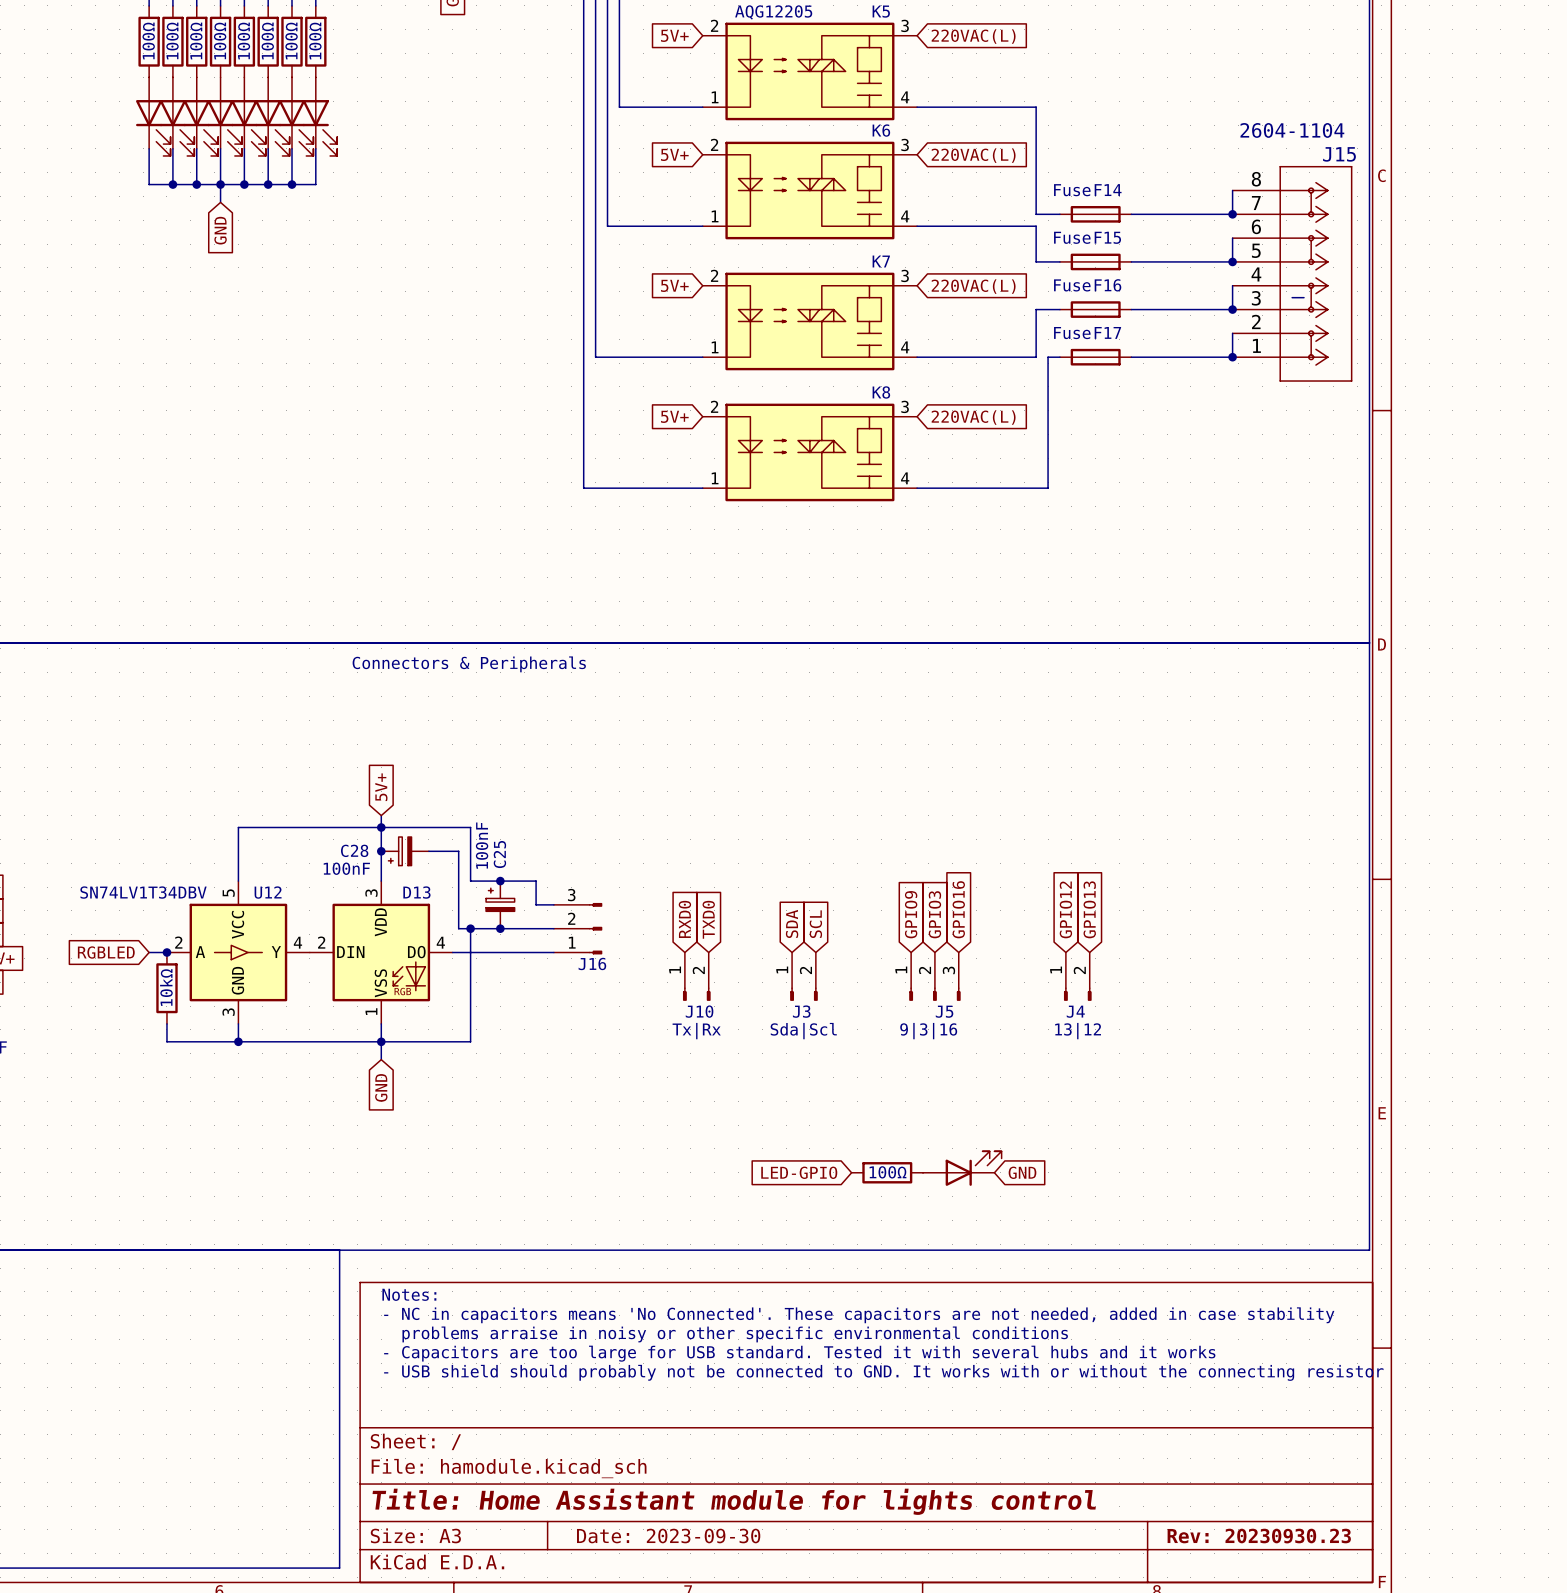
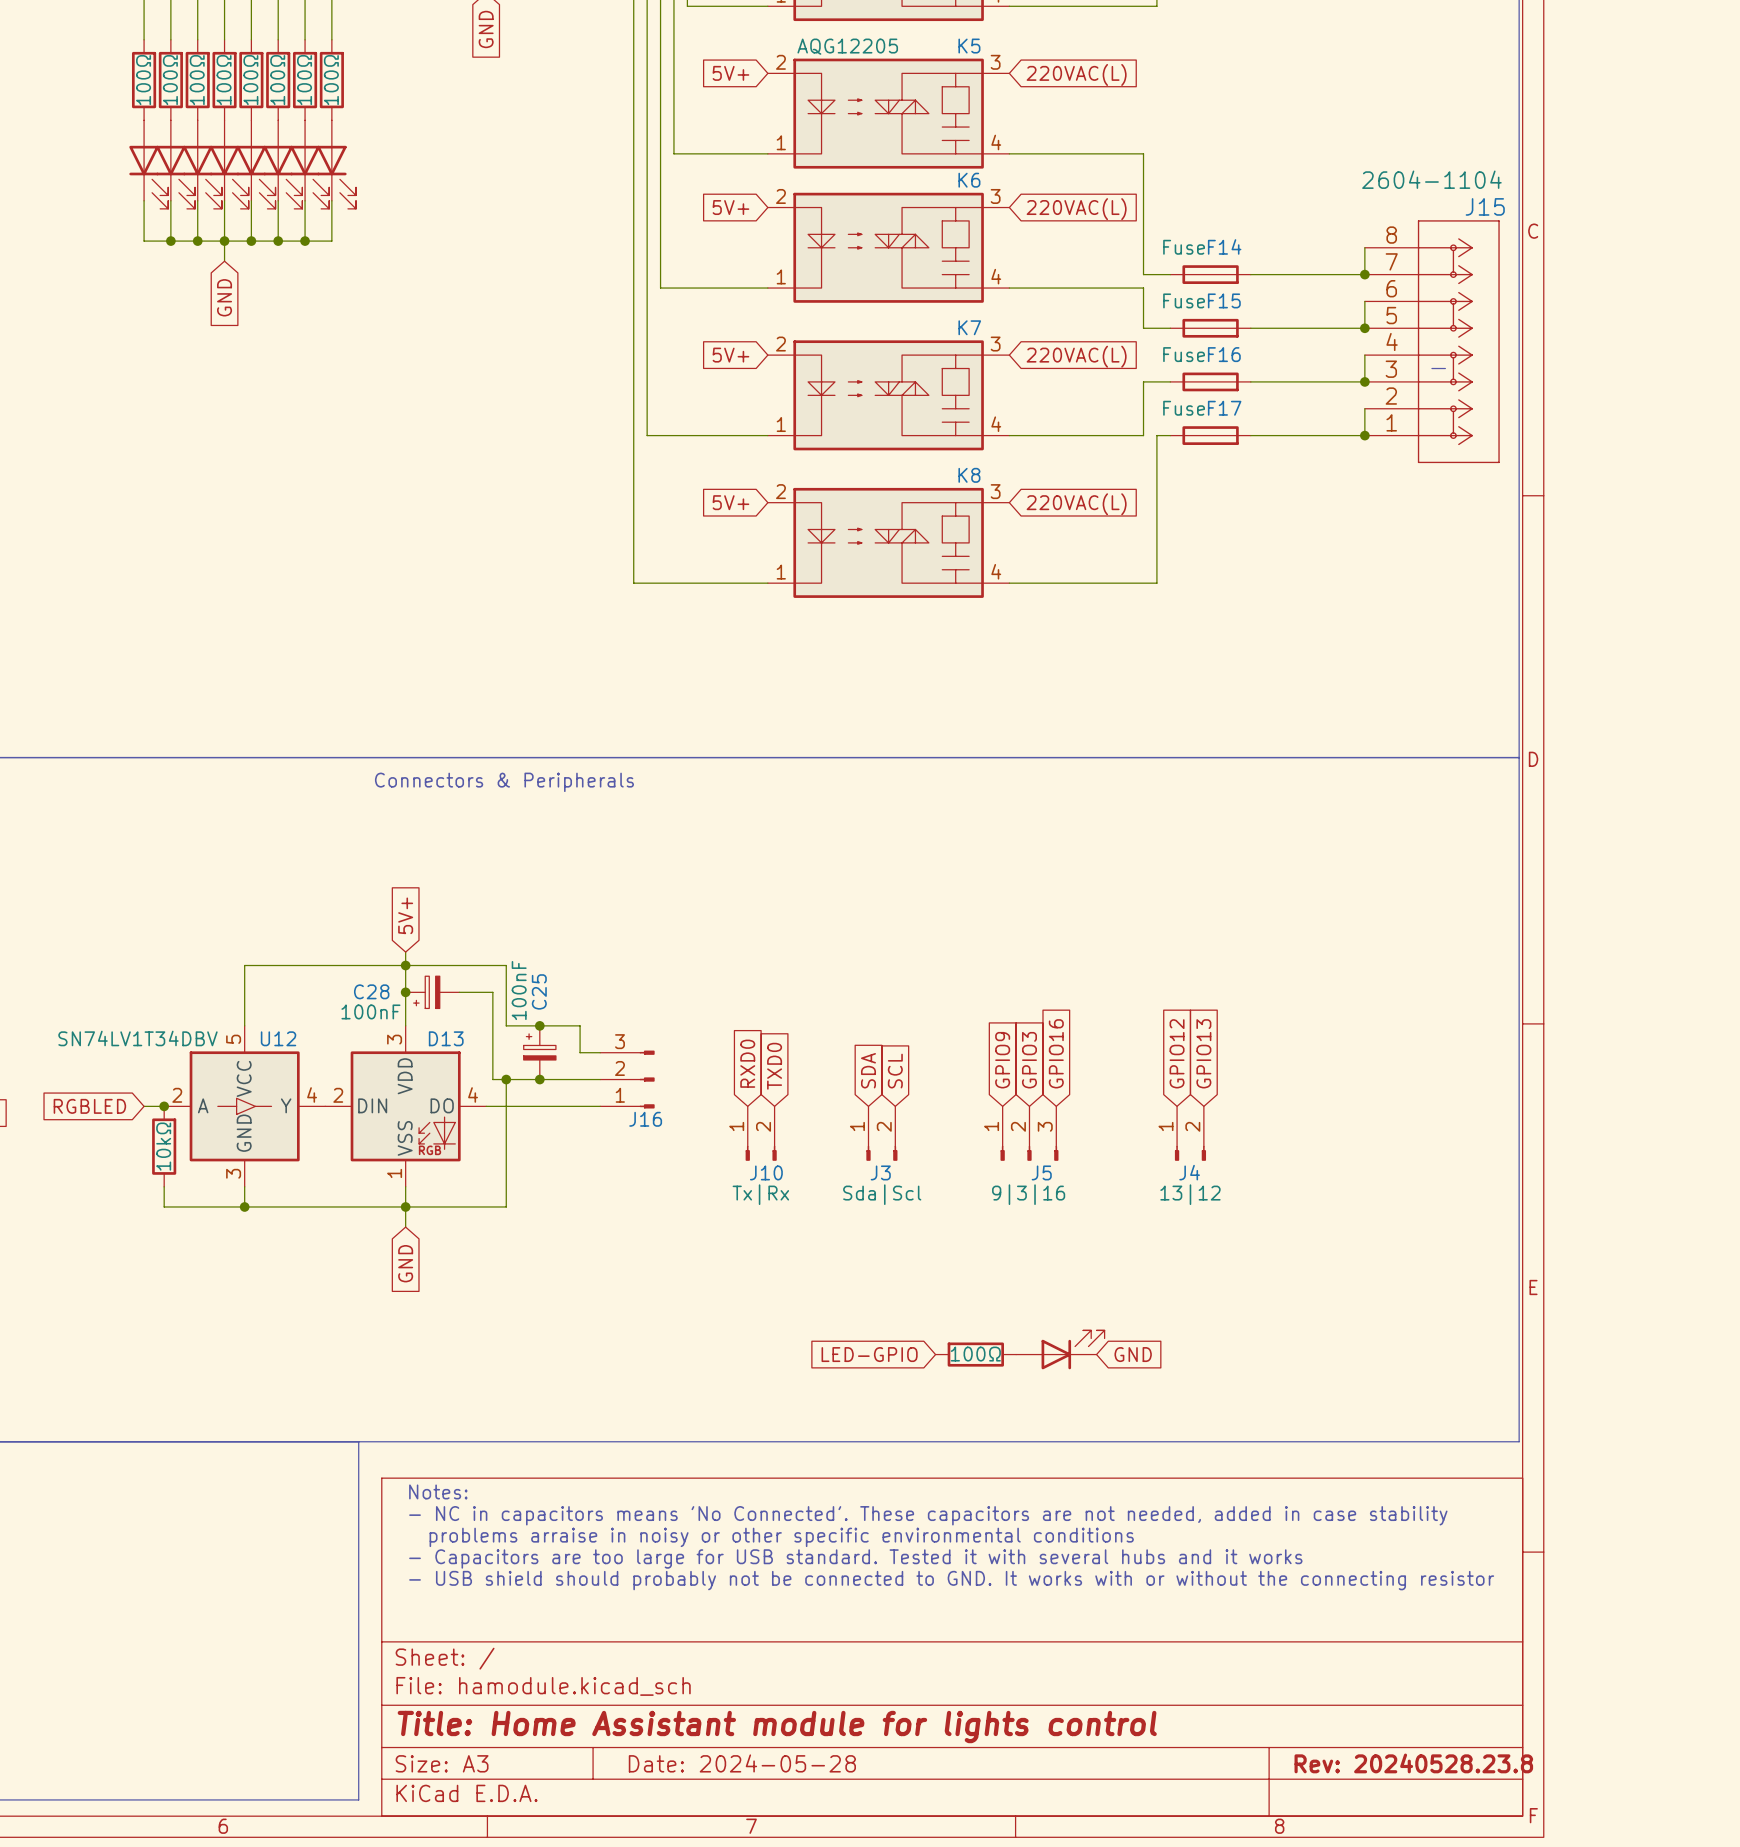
title block: Date: 2023-09-30 (668, 1536) -> Date: 2024-05-28 (742, 1763)
title block: Rev: 20230930.23 (1259, 1536) -> Rev: 20240528.23.8 (1413, 1763)

